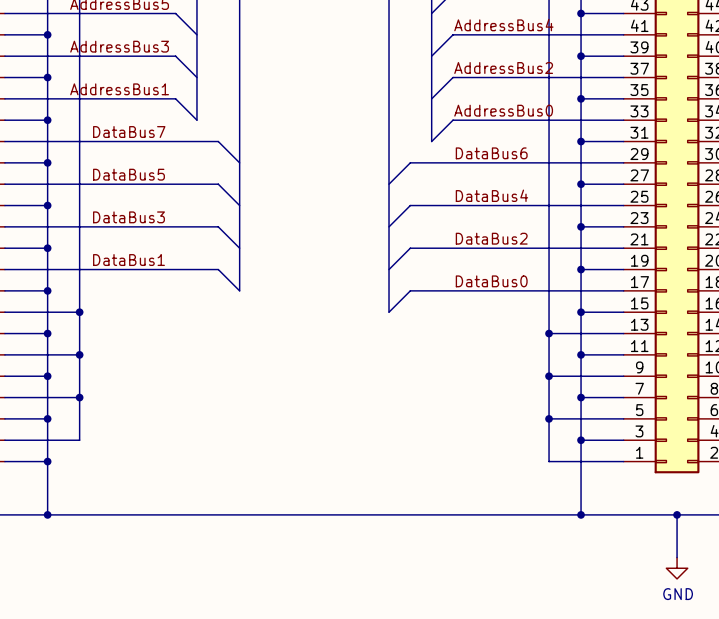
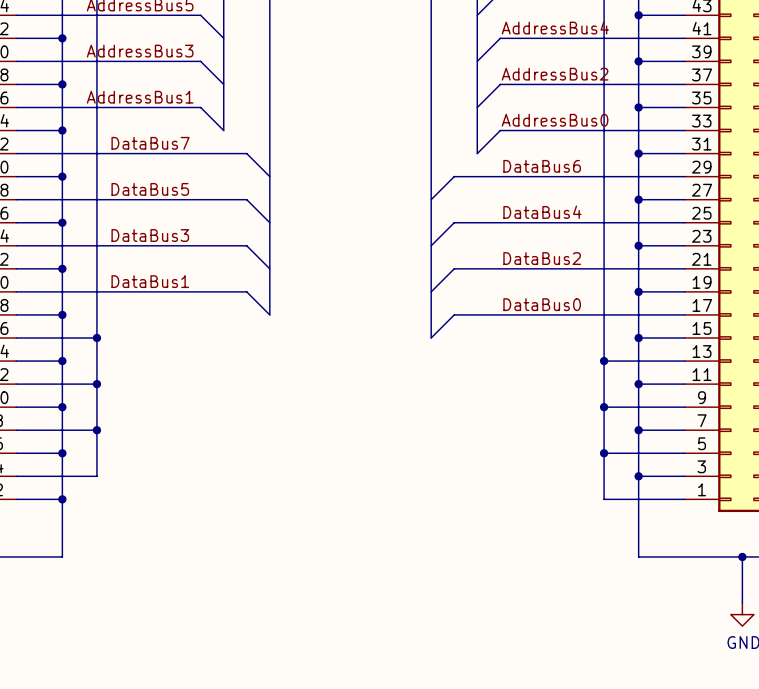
wire: (47, 514) (581, 514) -> none
junction: (47, 514) -> none
junction: (581, 514) -> none

